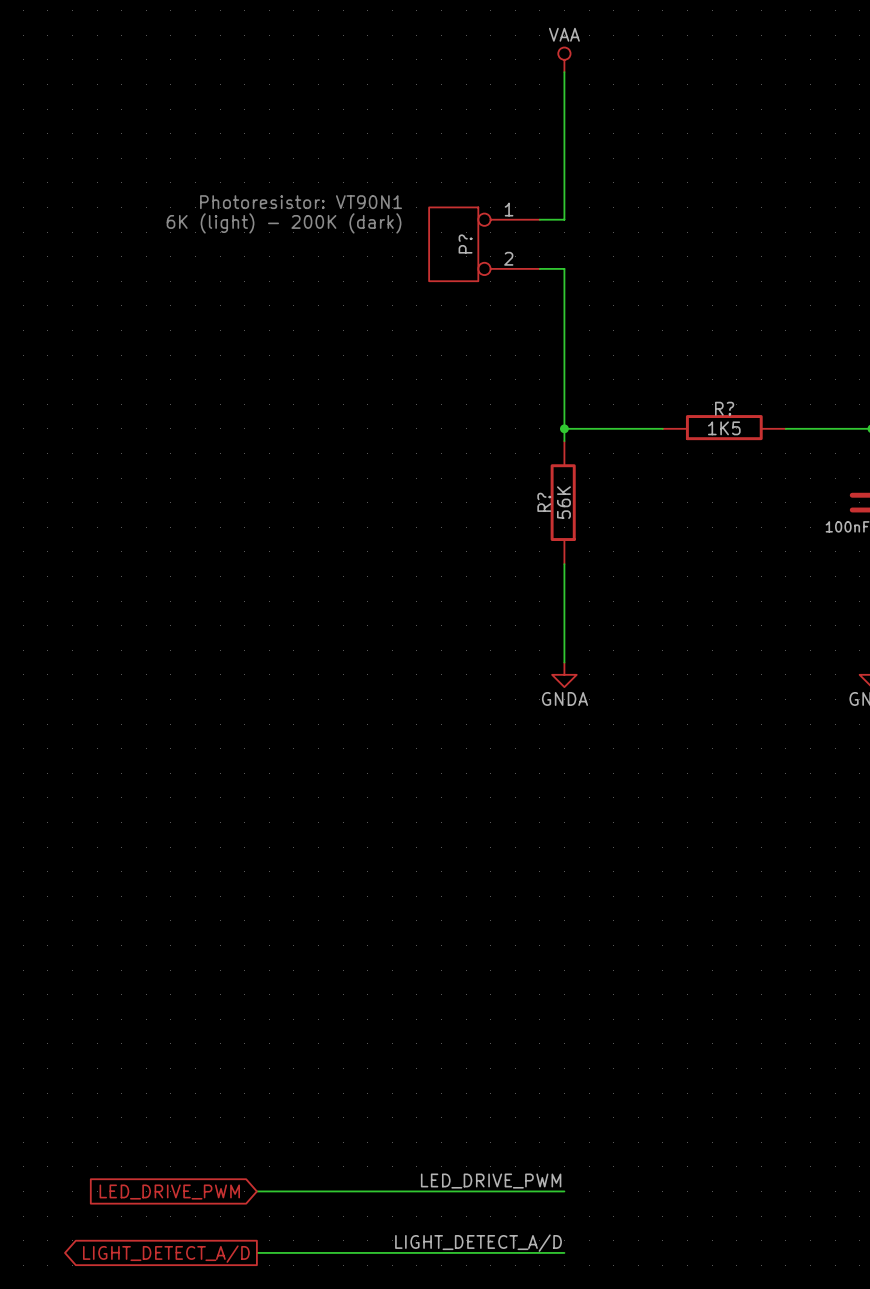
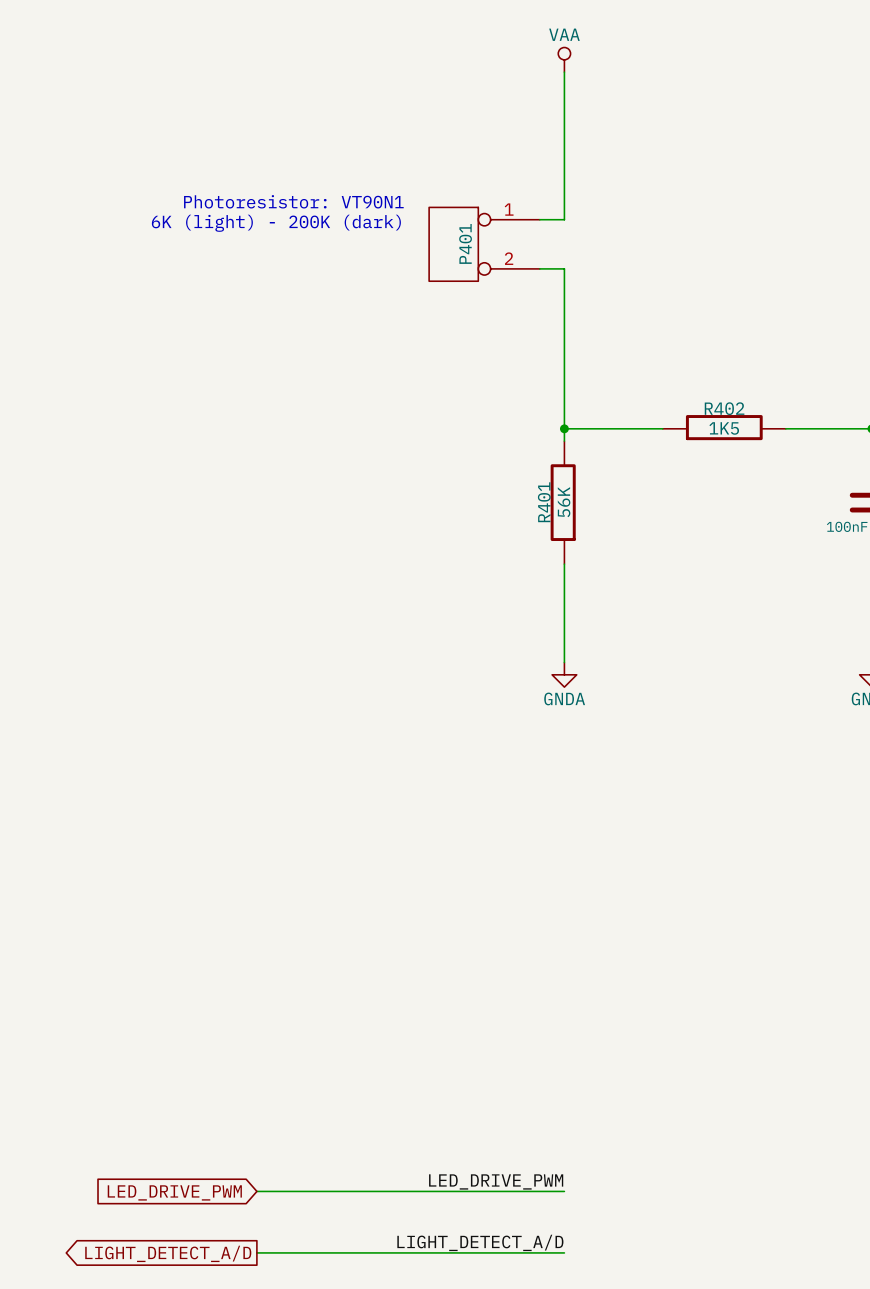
P? name: P? (465, 244) -> P401 (465, 243)
R? name: R? (724, 408) -> R402 (724, 408)
R? name: R? (544, 502) -> R401 (544, 502)

